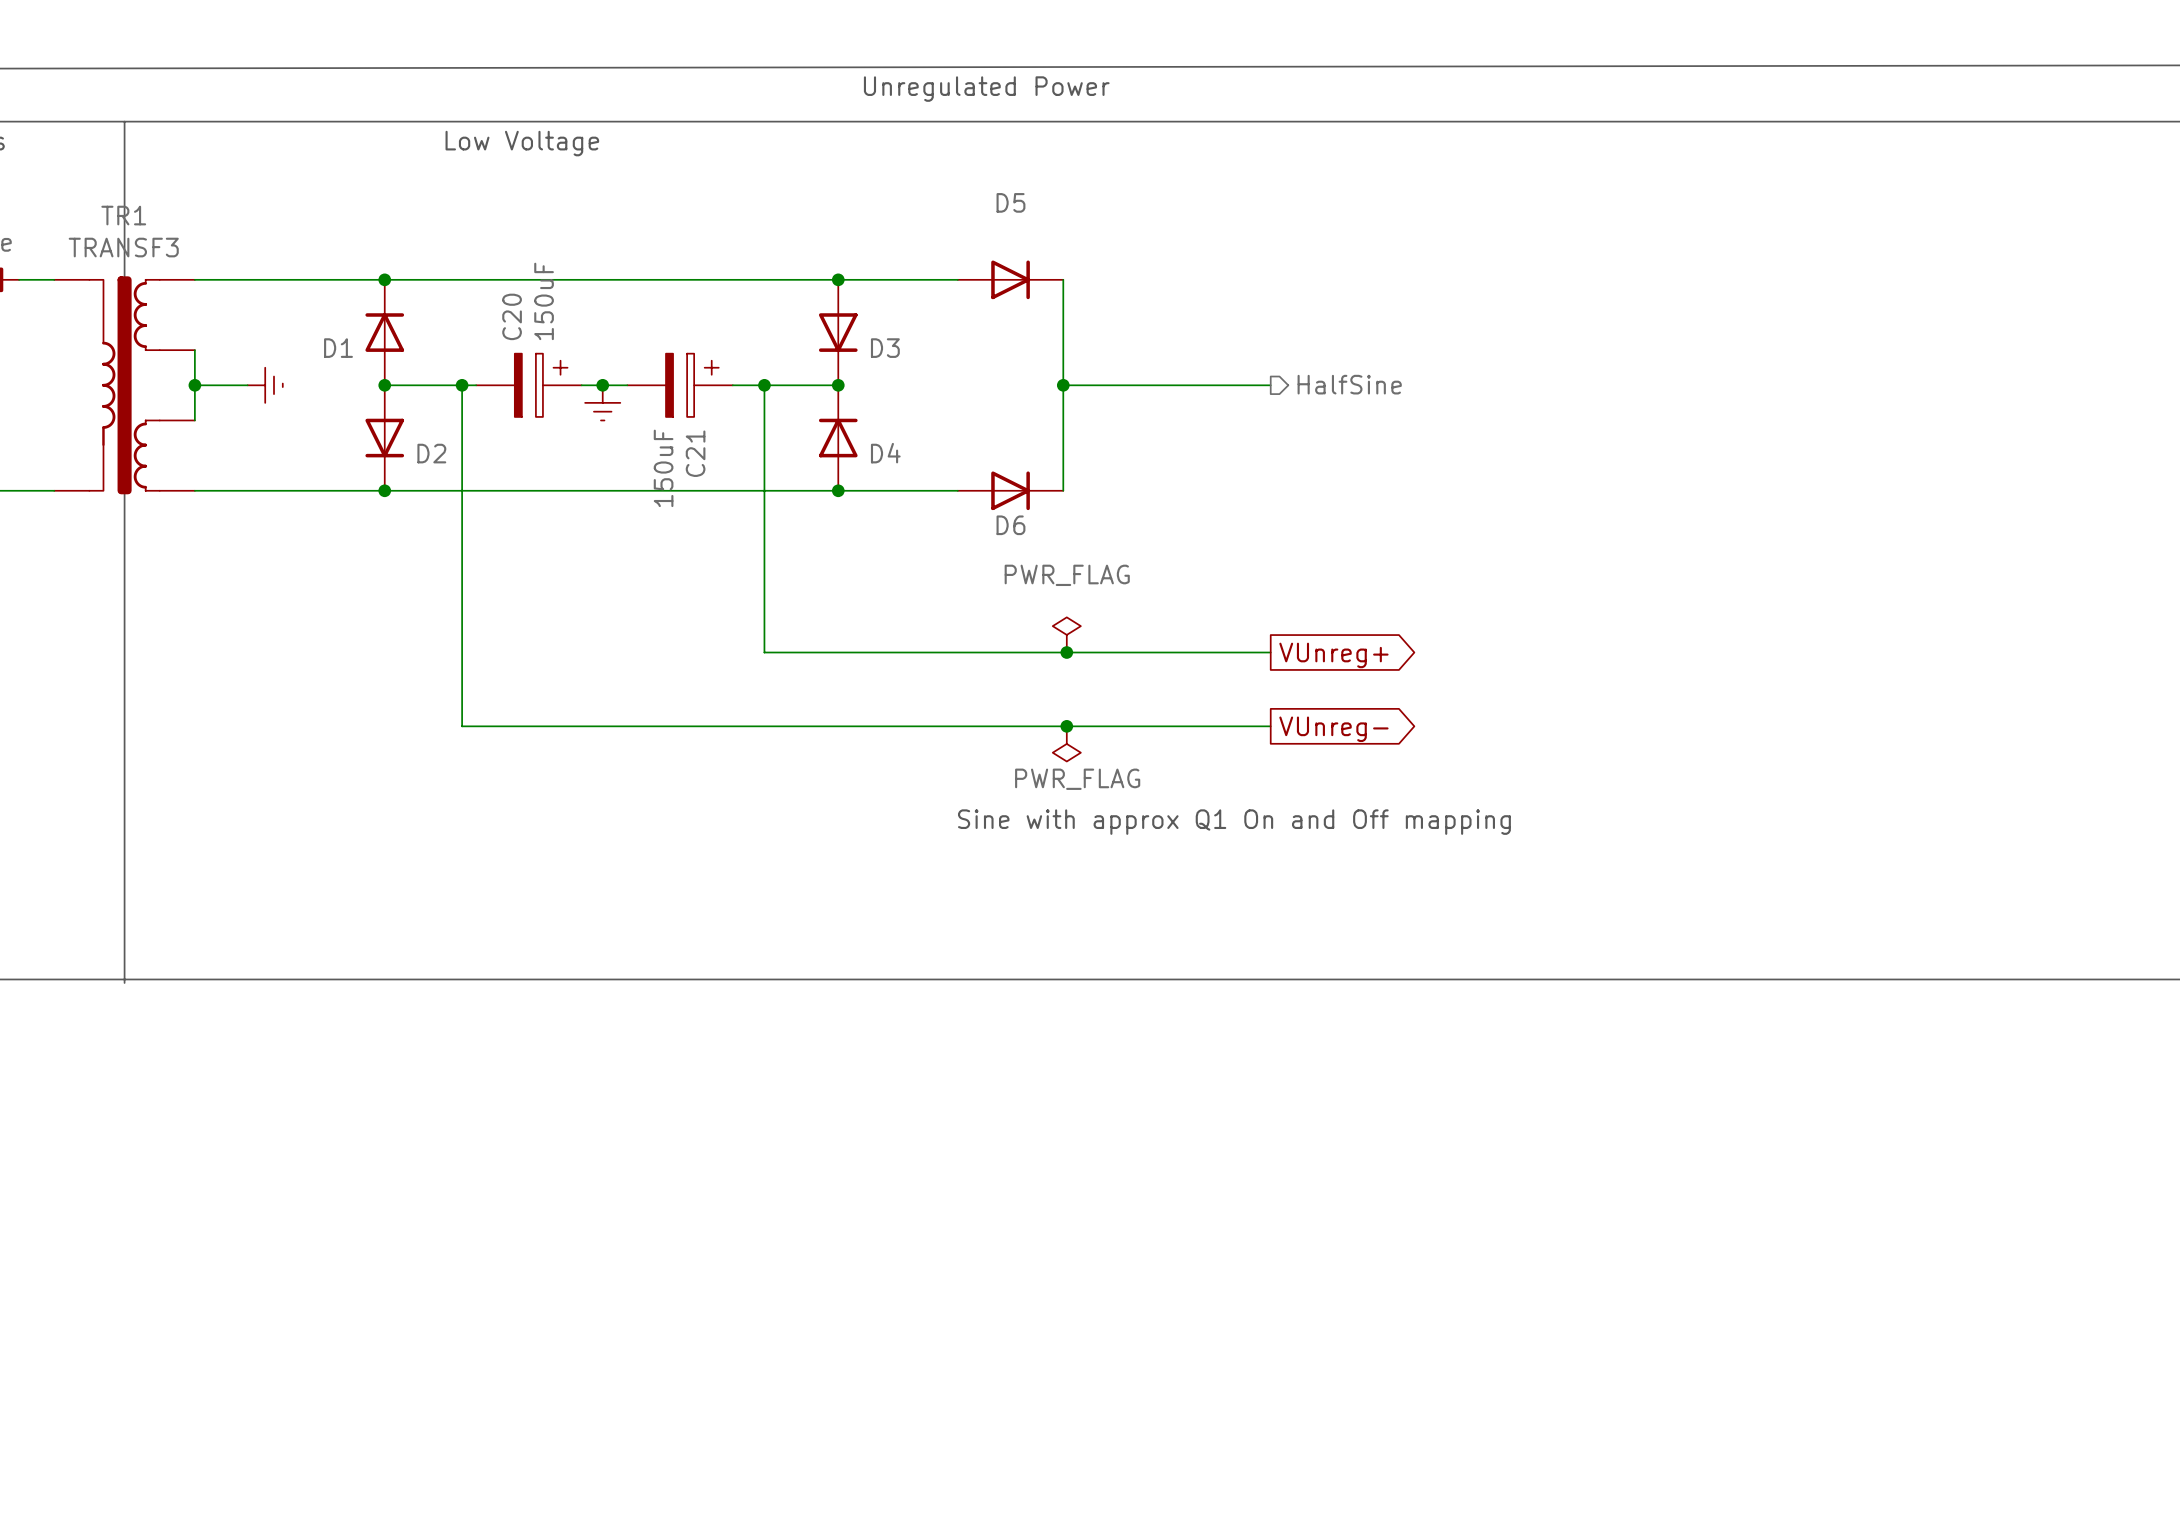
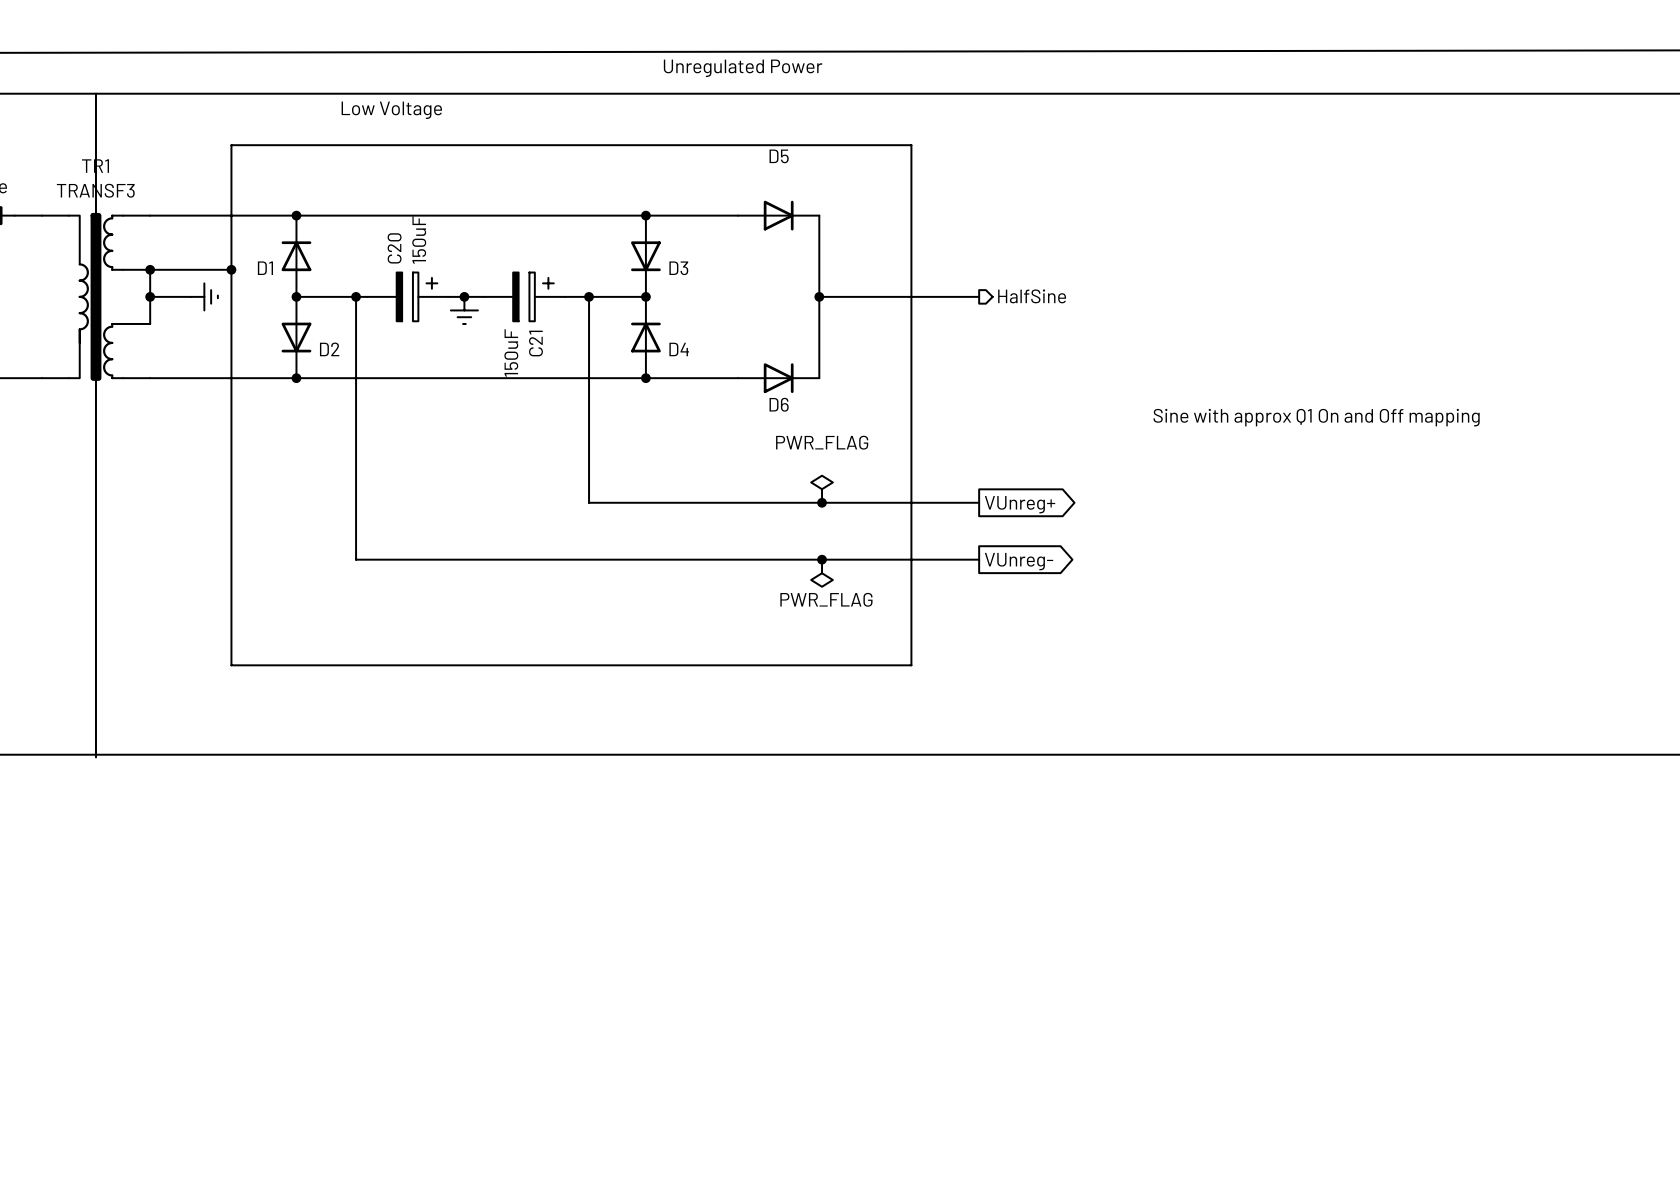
wire: none -> (231, 145) (231, 665) (911, 665) (911, 145) (231, 145)
wire: none -> (150, 269) (231, 269)
junction: none -> (150, 269)
junction: none -> (231, 269)
text: none -> Sine with approx Q1 On and Off mapping (1316, 417)
text: Sine with approx Q1 On and Off mapping (1234, 822) -> none

